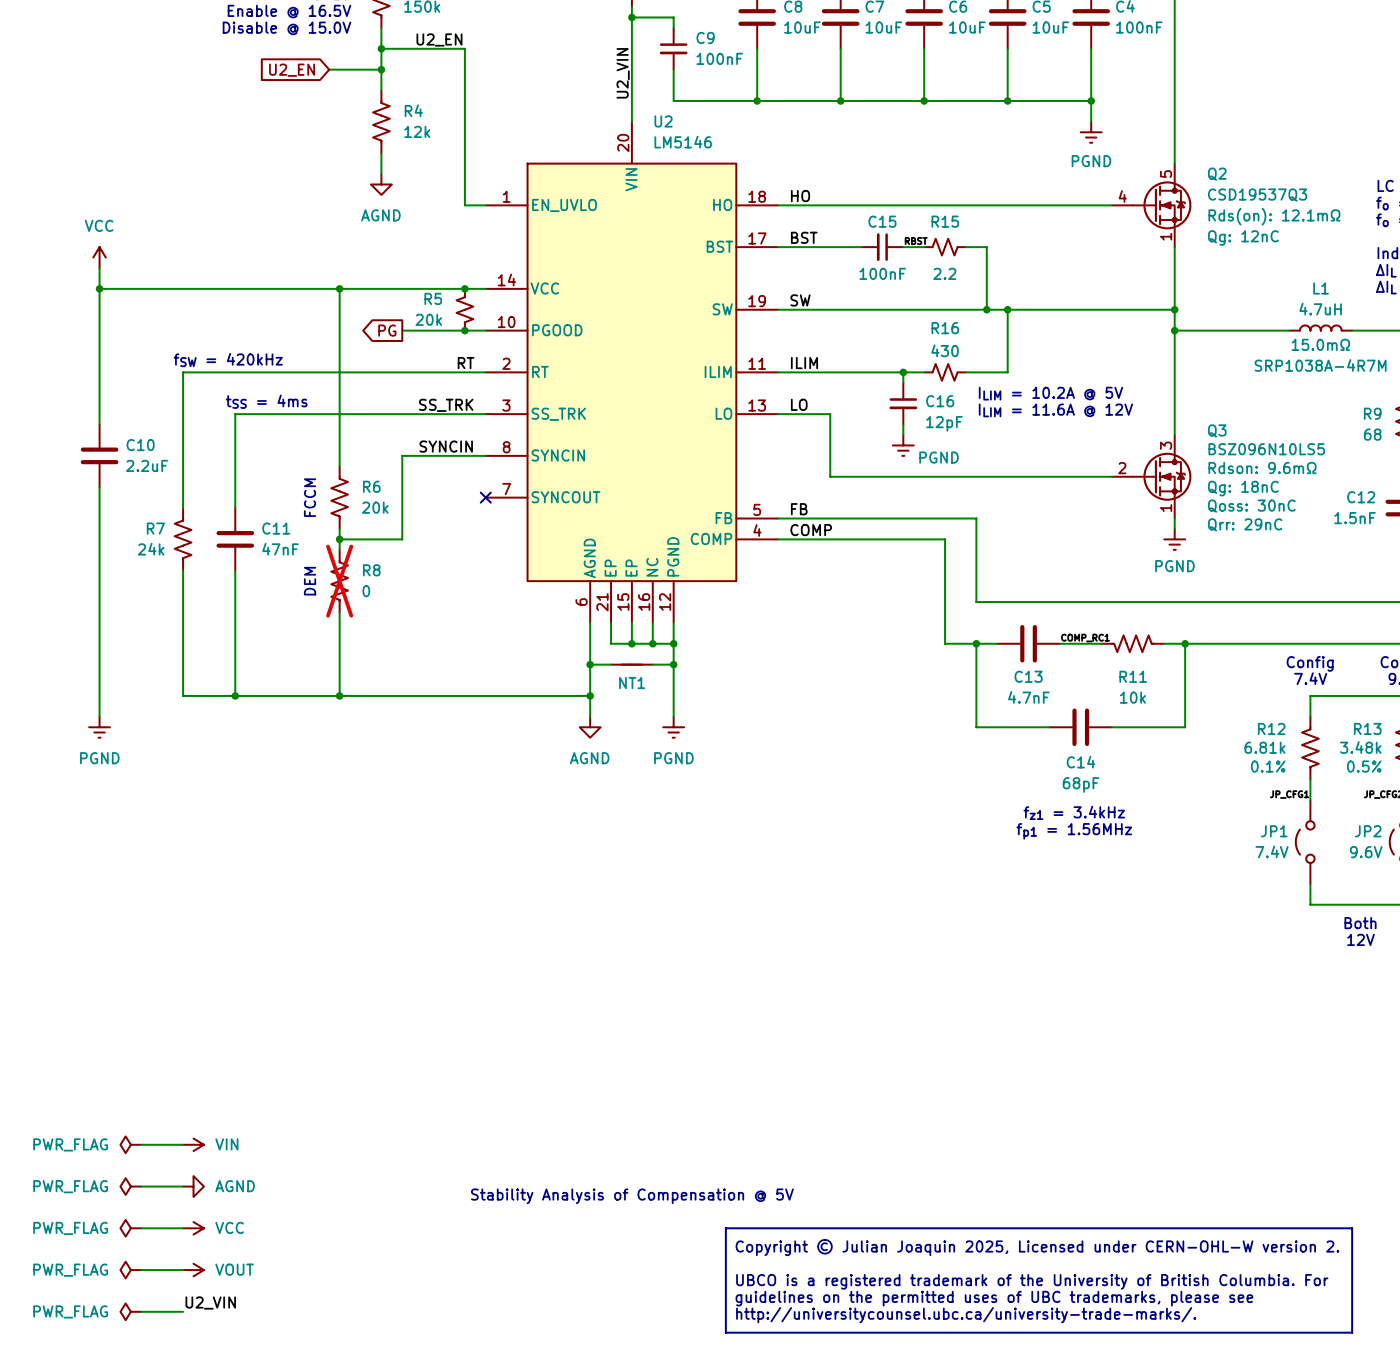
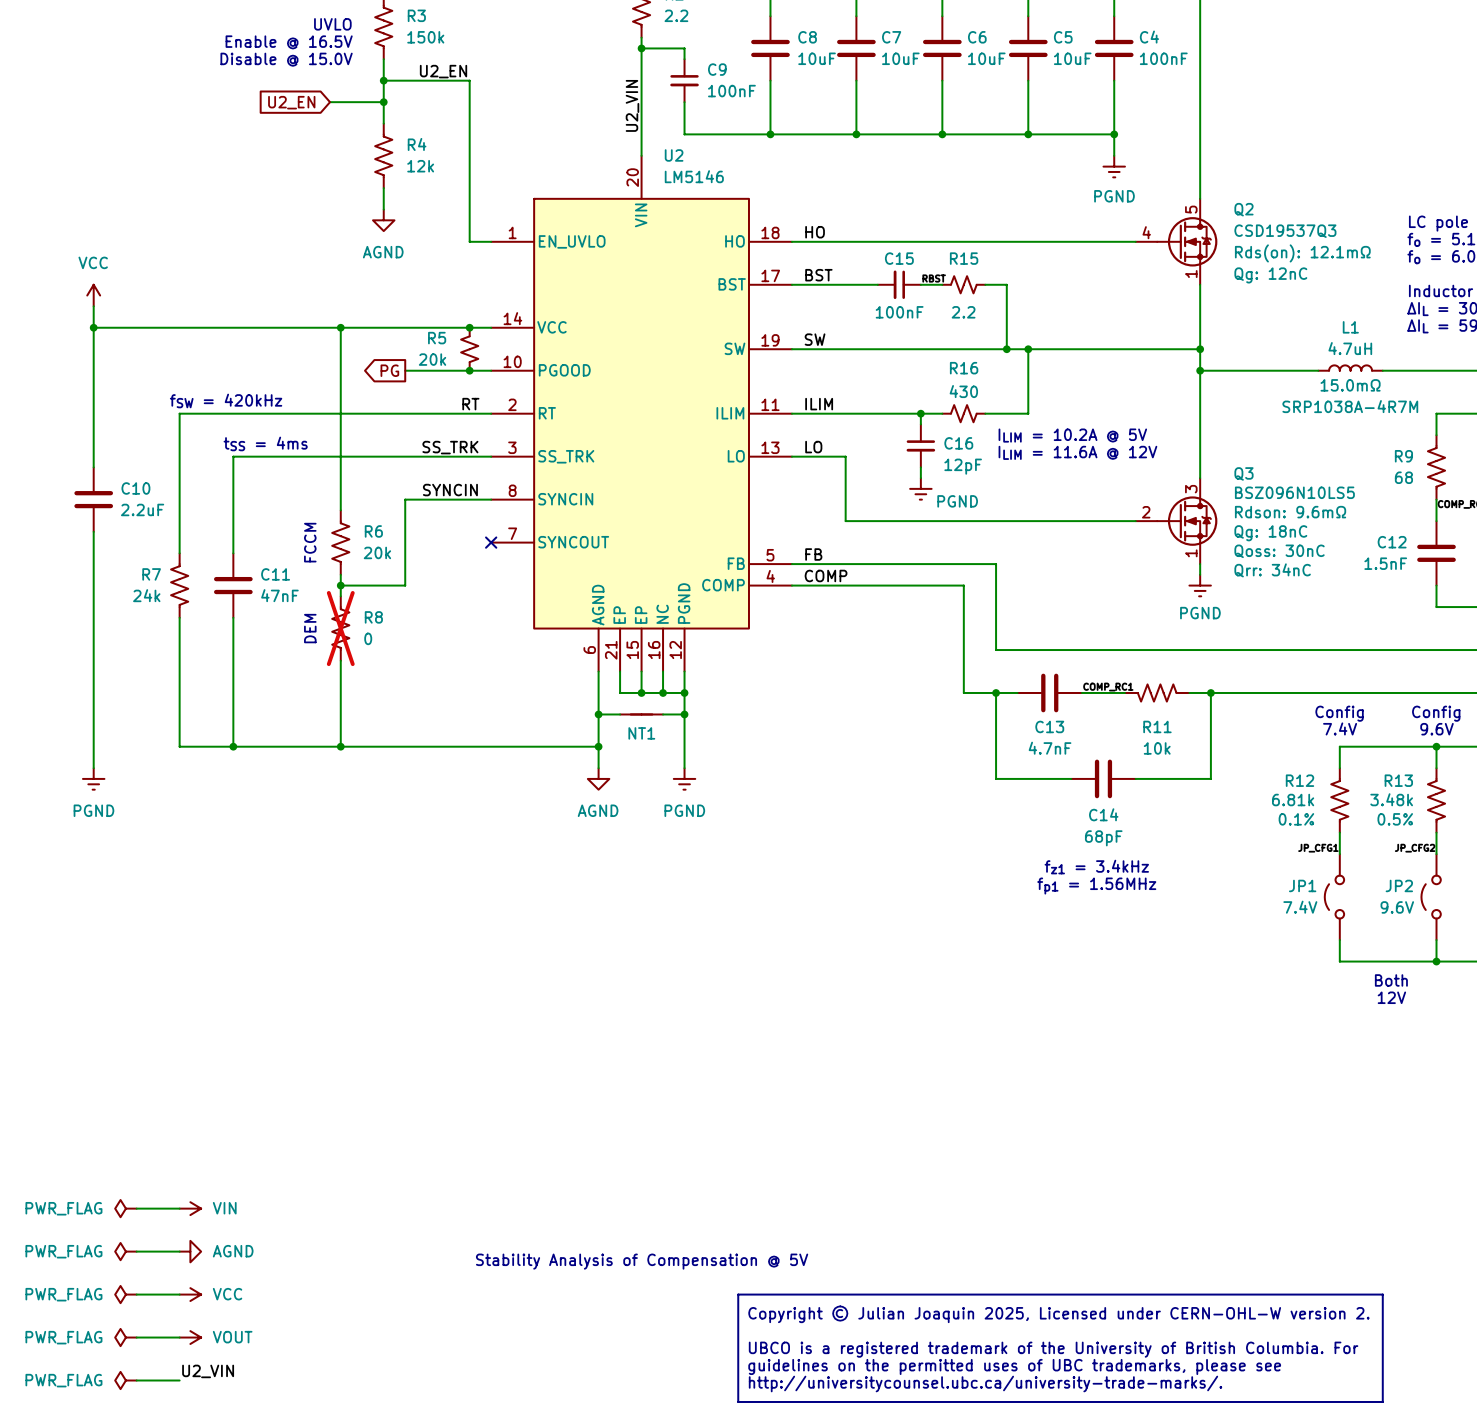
Q3 text: Qrr: 29nC (1245, 524) -> Qrr: 34nC (1272, 570)

